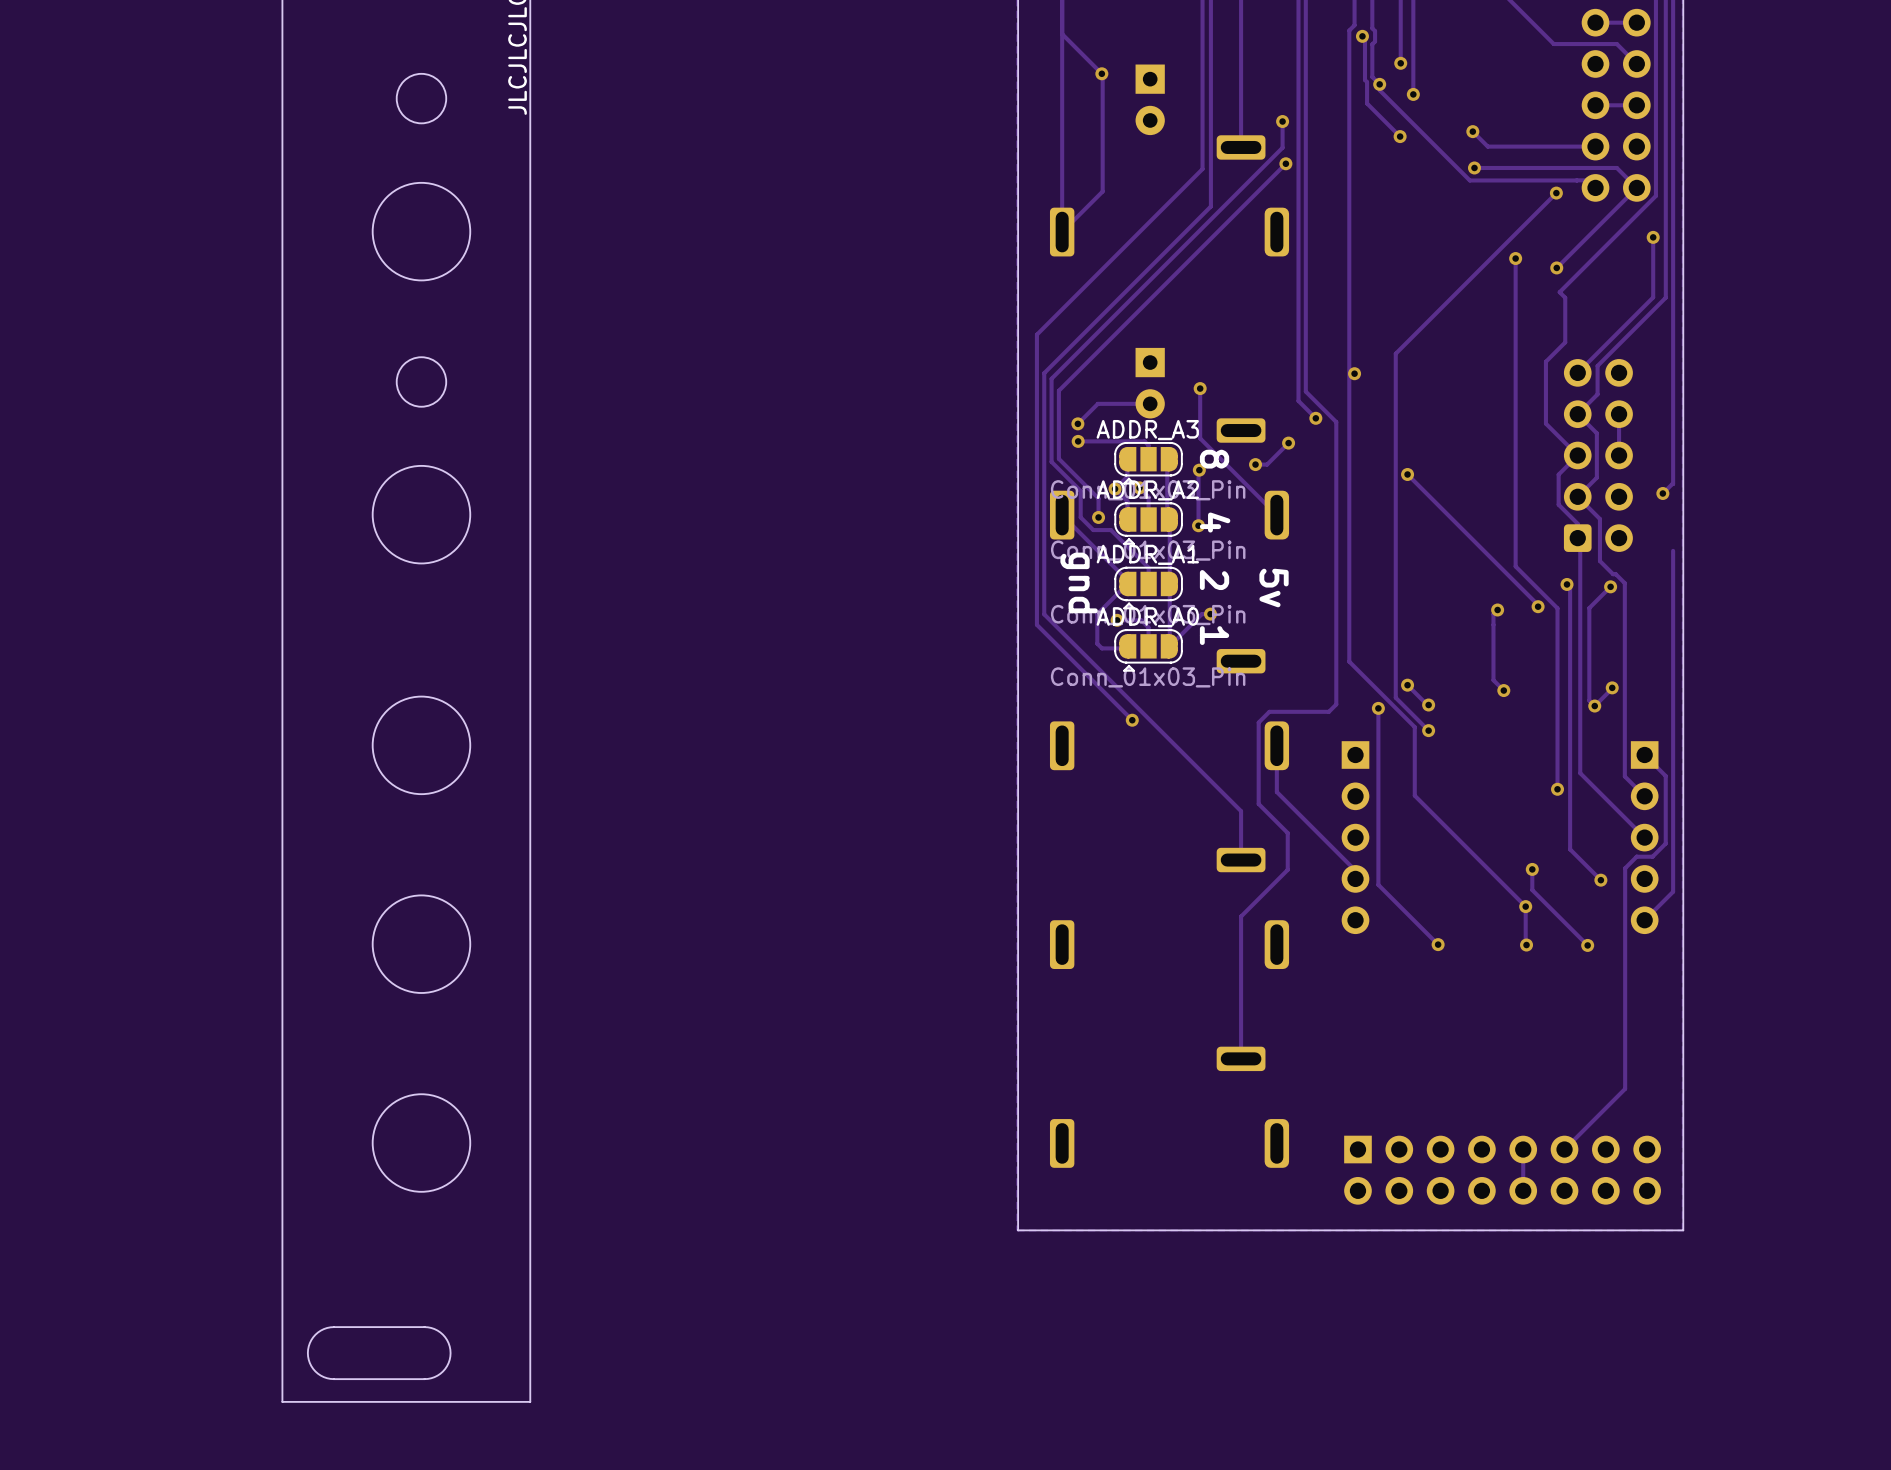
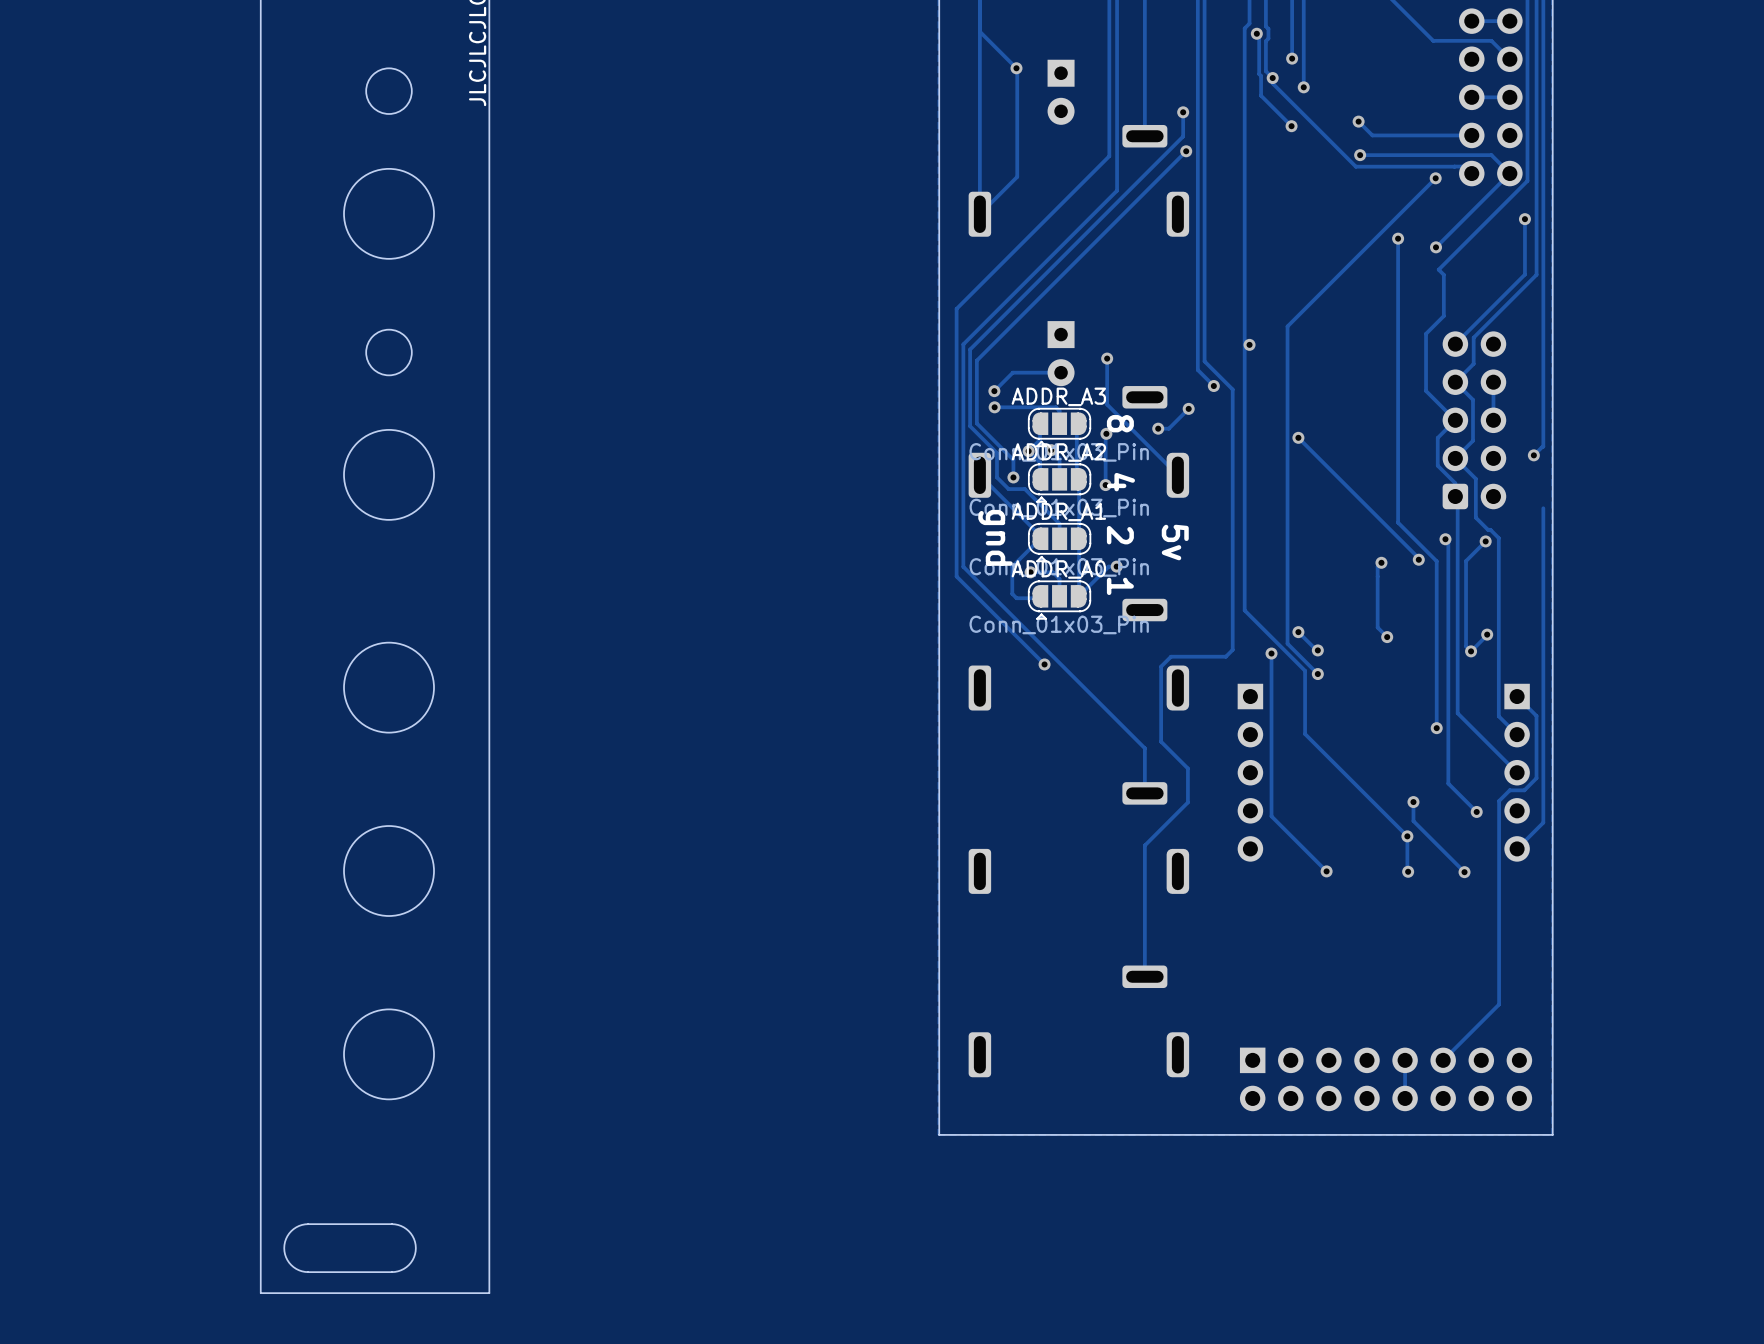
track: (1276, 745) (1276, 792) (1355, 870) (1355, 878) -> none

